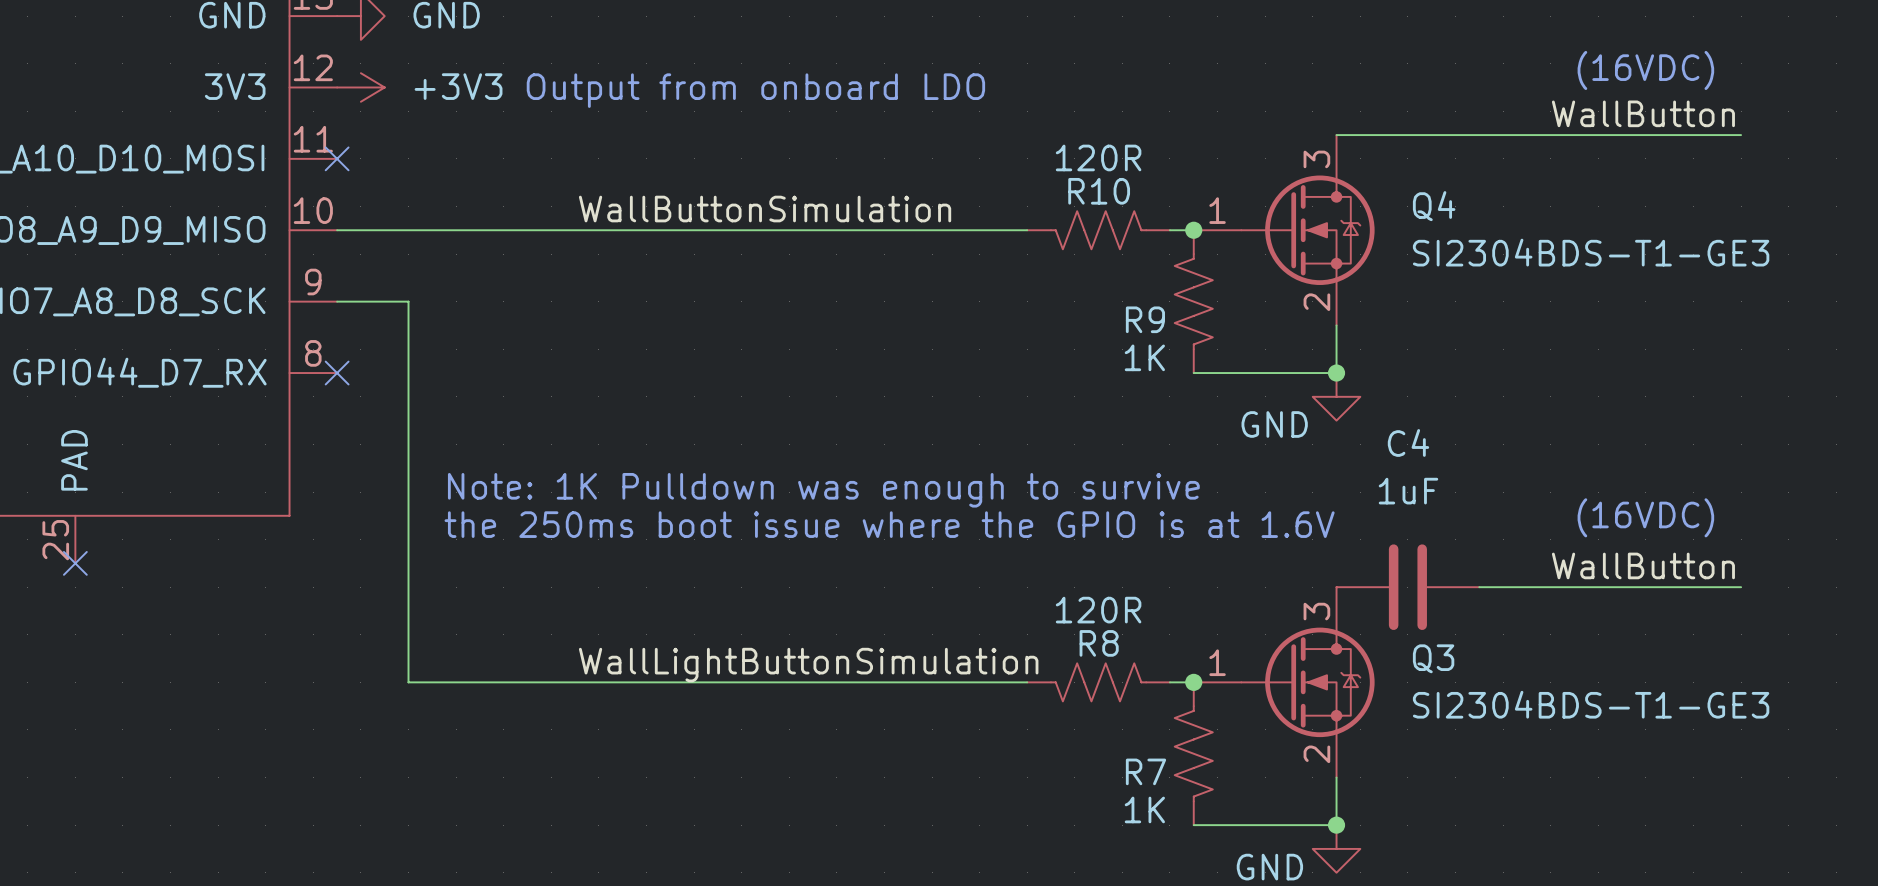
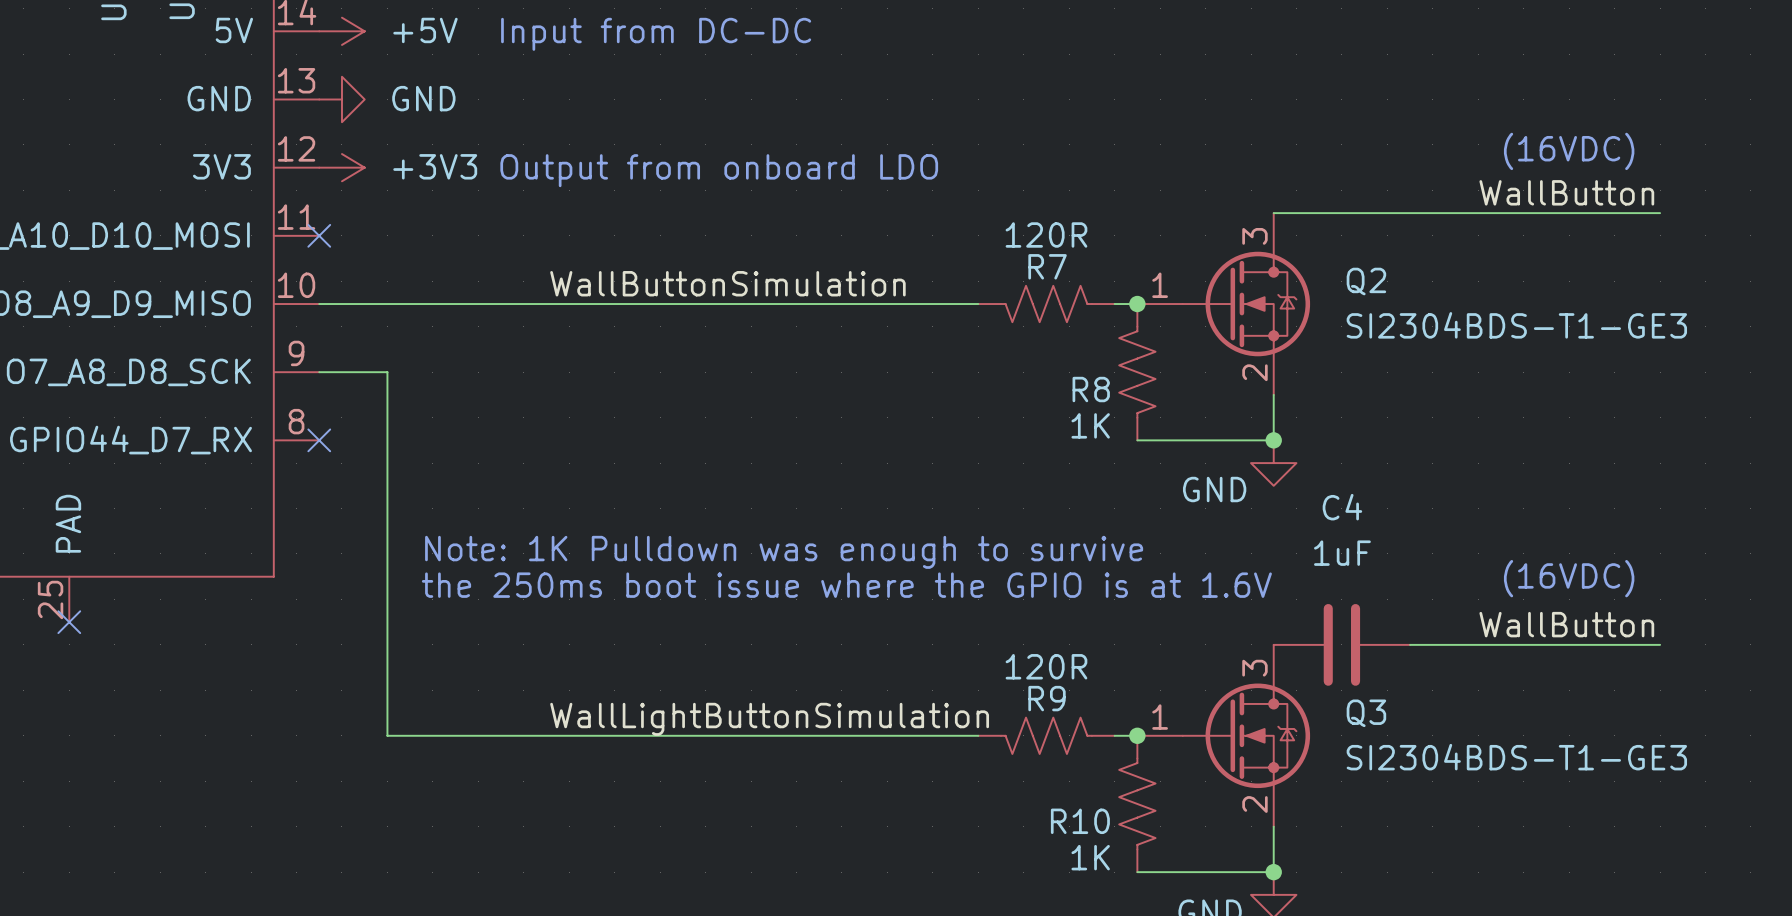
R10 name: R10 (1099, 191) -> R7 (1047, 266)
Q4 name: Q4 (1434, 206) -> Q2 (1366, 281)
R9 name: R9 (1145, 319) -> R8 (1091, 389)
R8 name: R8 (1099, 643) -> R9 (1047, 698)
R7 name: R7 (1145, 771) -> R10 (1080, 821)

